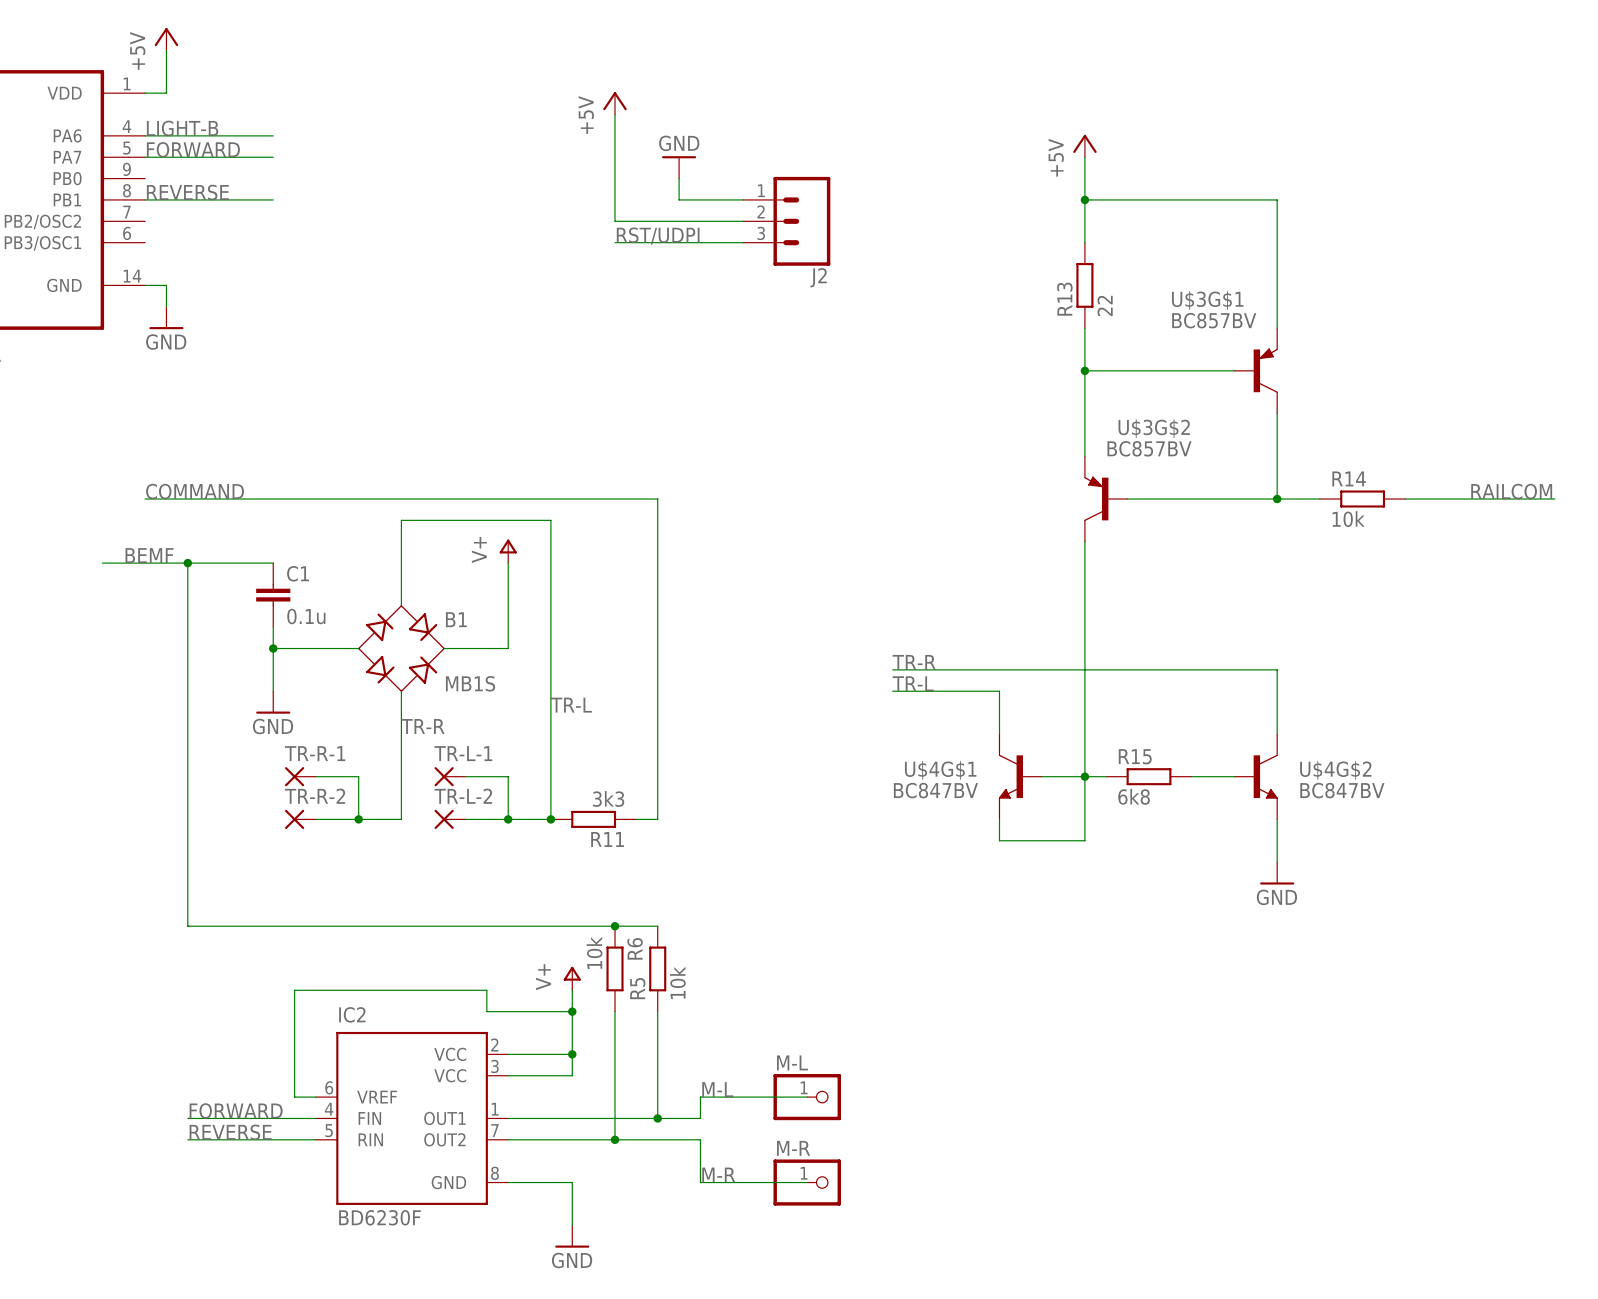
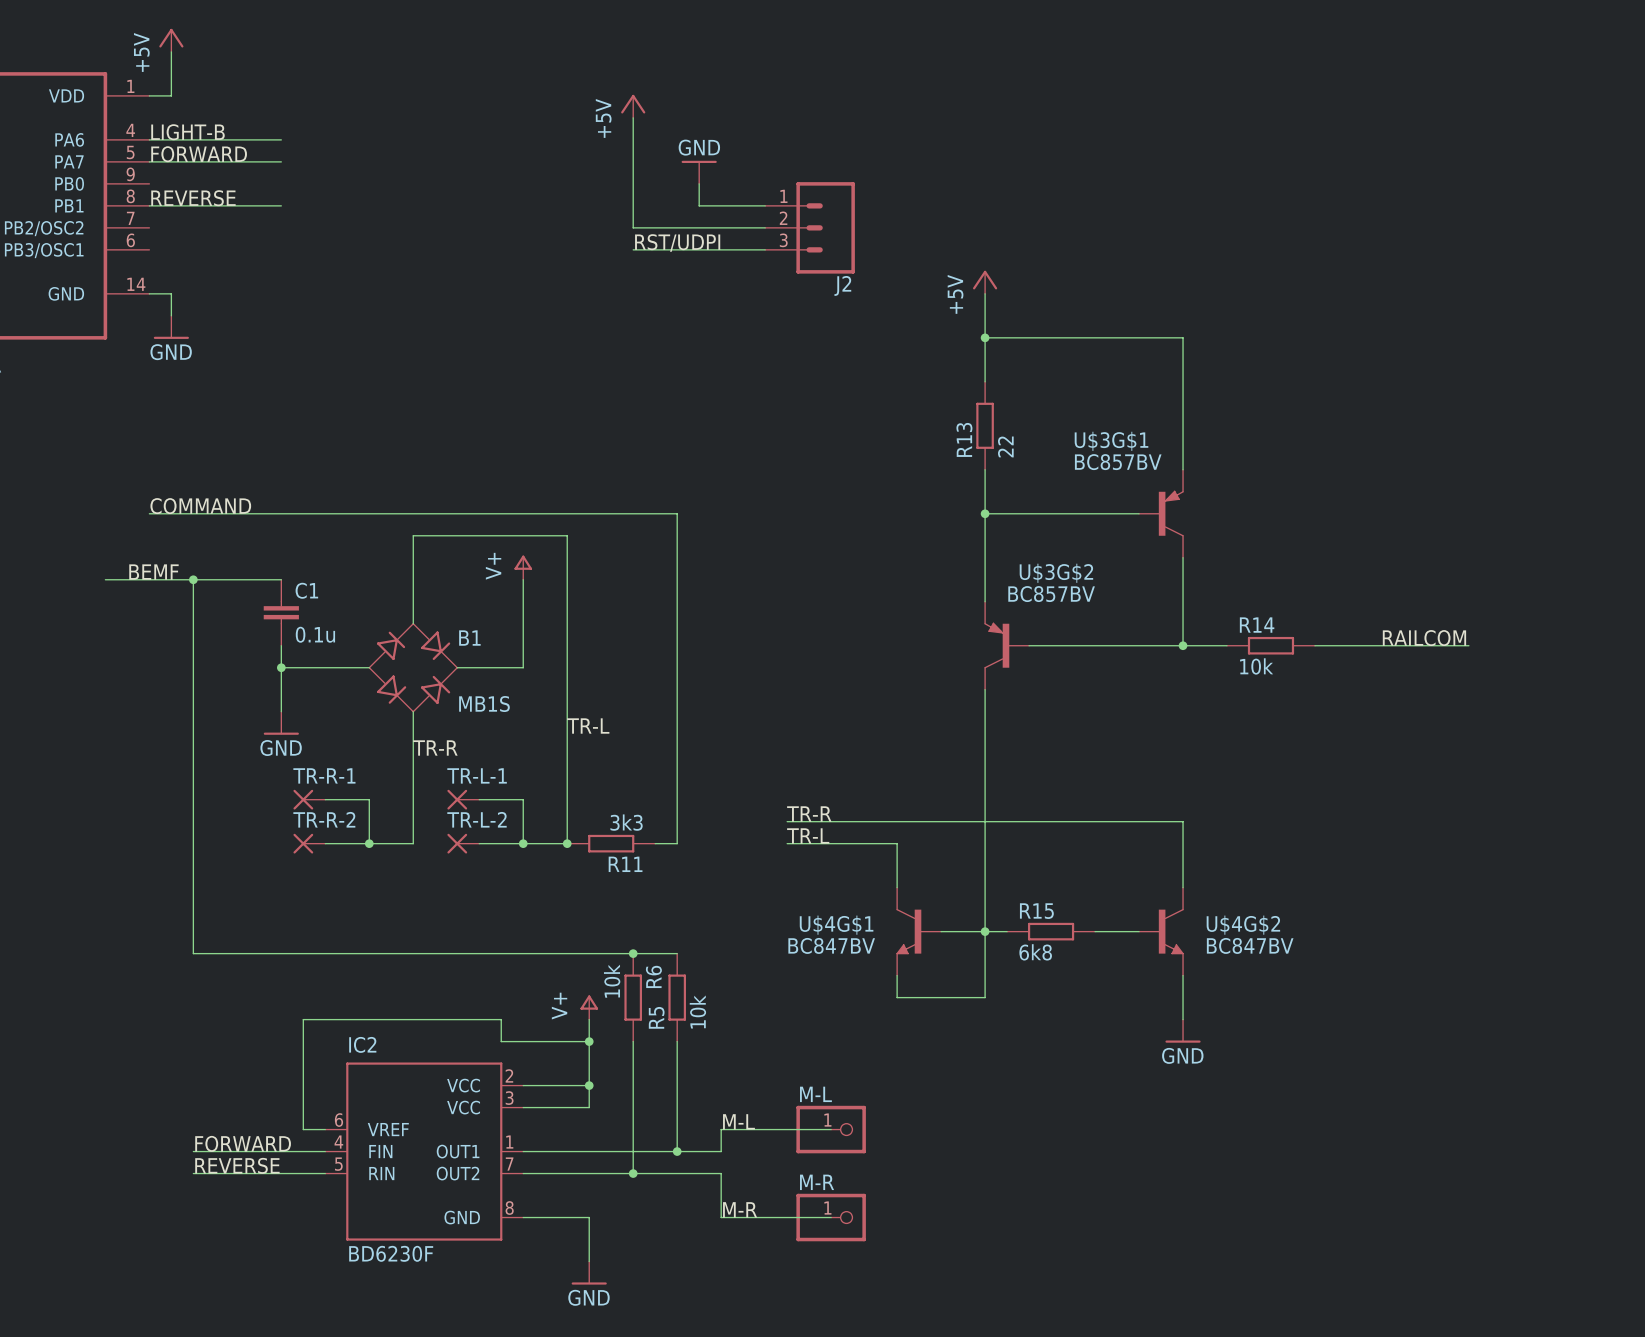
power symbol position: +5V (1084, 146) -> +5V (985, 282)
wire: (1084, 157) (1084, 242) -> (985, 293) (985, 381)
wire: (1084, 199) (1277, 199) (1277, 328) -> (985, 337) (1183, 337) (1183, 469)
junction: (1084, 199) -> none
R13 position: (1084, 285) -> (985, 425)
junction: none -> (985, 337)
wire: (1084, 328) (1084, 456) -> (985, 469) (985, 601)
wire: (1084, 370) (1234, 370) -> (985, 513) (1139, 513)
junction: (1084, 370) -> none
U$3G$1 position: (1256, 370) -> (1161, 513)
wire: (1277, 413) (1277, 499) -> (1183, 557) (1183, 645)
label position: RAILCOM (1511, 491) -> RAILCOM (1424, 638)
junction: none -> (985, 513)
U$3G$2 position: (1105, 499) -> (1006, 645)
wire: (1127, 499) (1319, 499) -> (1029, 645) (1227, 645)
junction: (1277, 499) -> none
R14 position: (1362, 499) -> (1270, 645)
wire: (1405, 499) (1554, 499) -> (1314, 645) (1468, 645)
wire: (1084, 541) (1084, 840) (999, 840) (999, 819) -> (985, 689) (985, 997) (897, 997) (897, 975)
junction: none -> (1183, 645)
label position: TR-R (914, 662) -> TR-R (809, 813)
wire: (892, 669) (1277, 669) (1277, 733) -> (787, 821) (1183, 821) (1183, 887)
label position: TR-L (913, 683) -> TR-L (808, 835)
wire: (892, 691) (999, 691) (999, 733) -> (787, 843) (897, 843) (897, 887)
U$4G$1 position: (1020, 776) -> (918, 931)
wire: (1042, 776) (1106, 776) -> (941, 931) (1007, 931)
junction: (1084, 776) -> none
R15 position: (1149, 776) -> (1051, 931)
wire: (1191, 776) (1234, 776) -> (1095, 931) (1139, 931)
U$4G$2 position: (1256, 776) -> (1161, 931)
wire: (1277, 819) (1277, 862) -> (1183, 975) (1183, 1019)
power symbol position: GND (1277, 873) -> GND (1183, 1031)
junction: none -> (985, 931)

